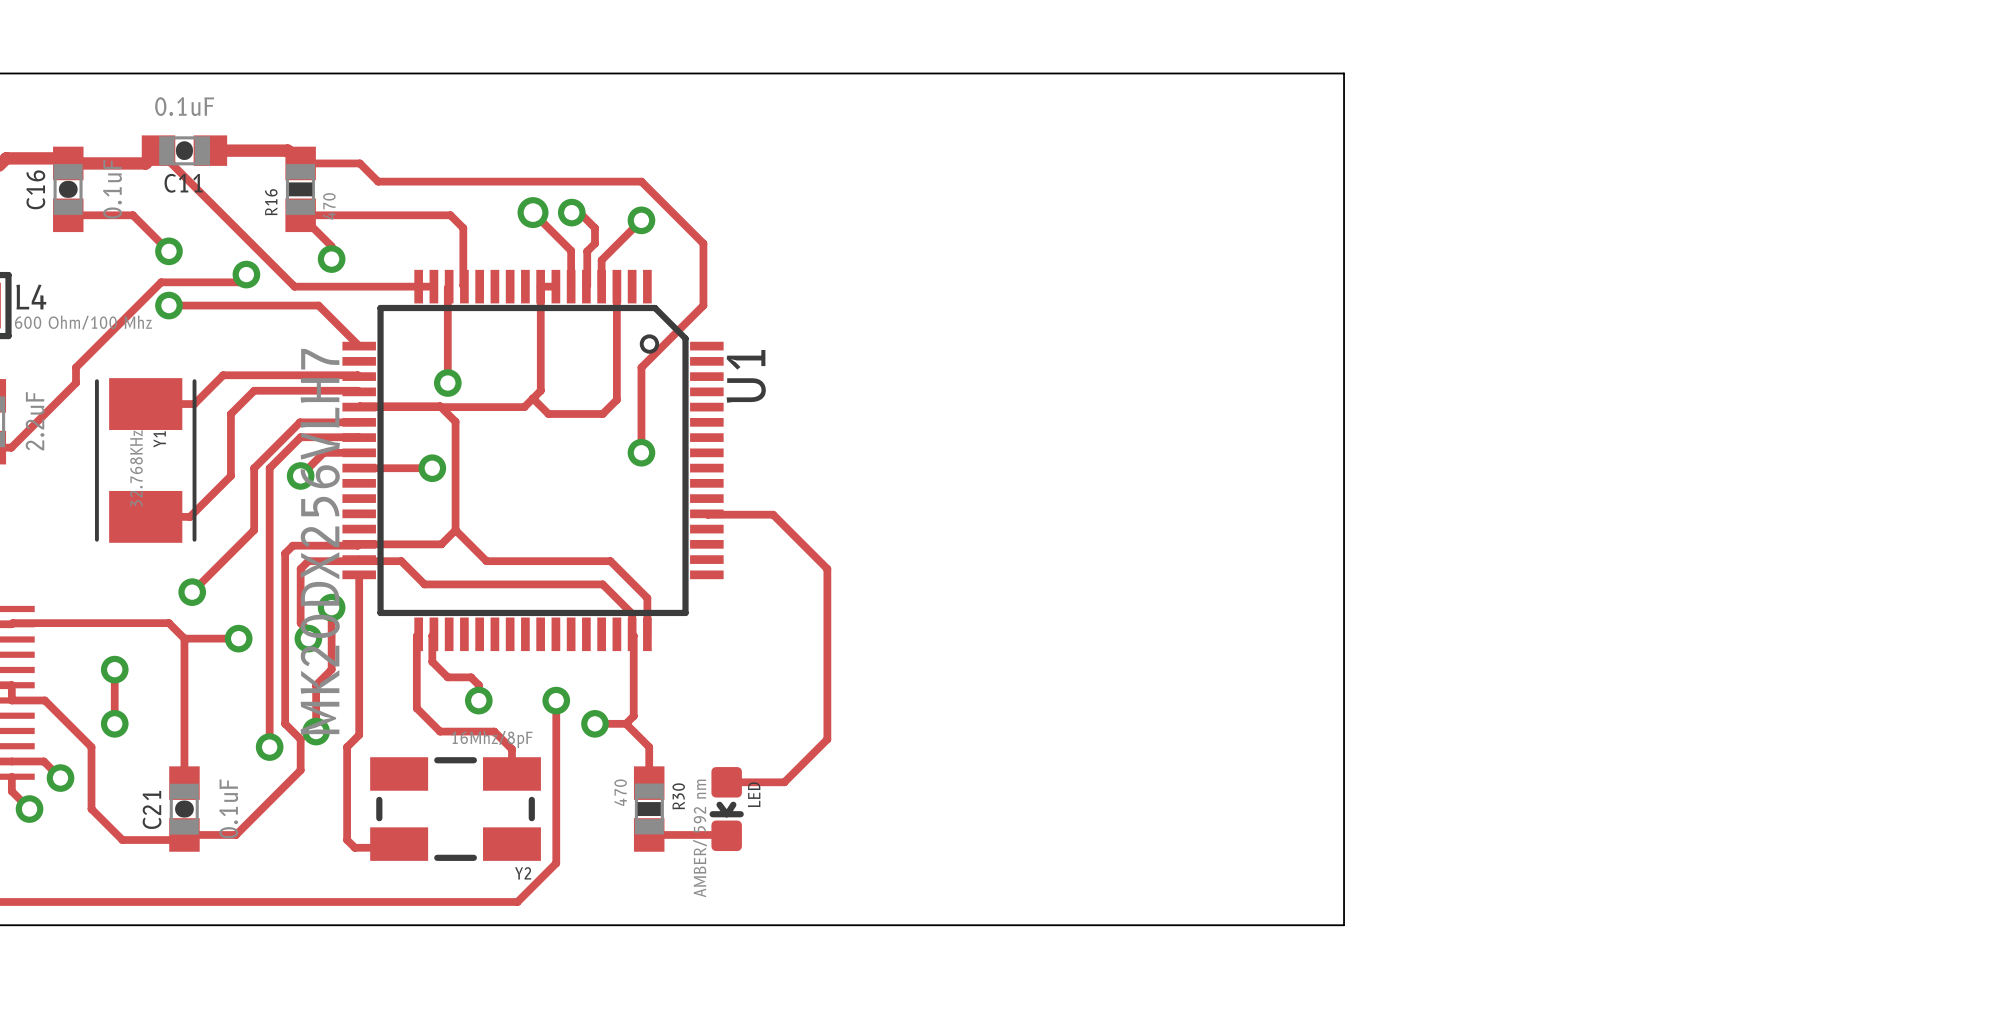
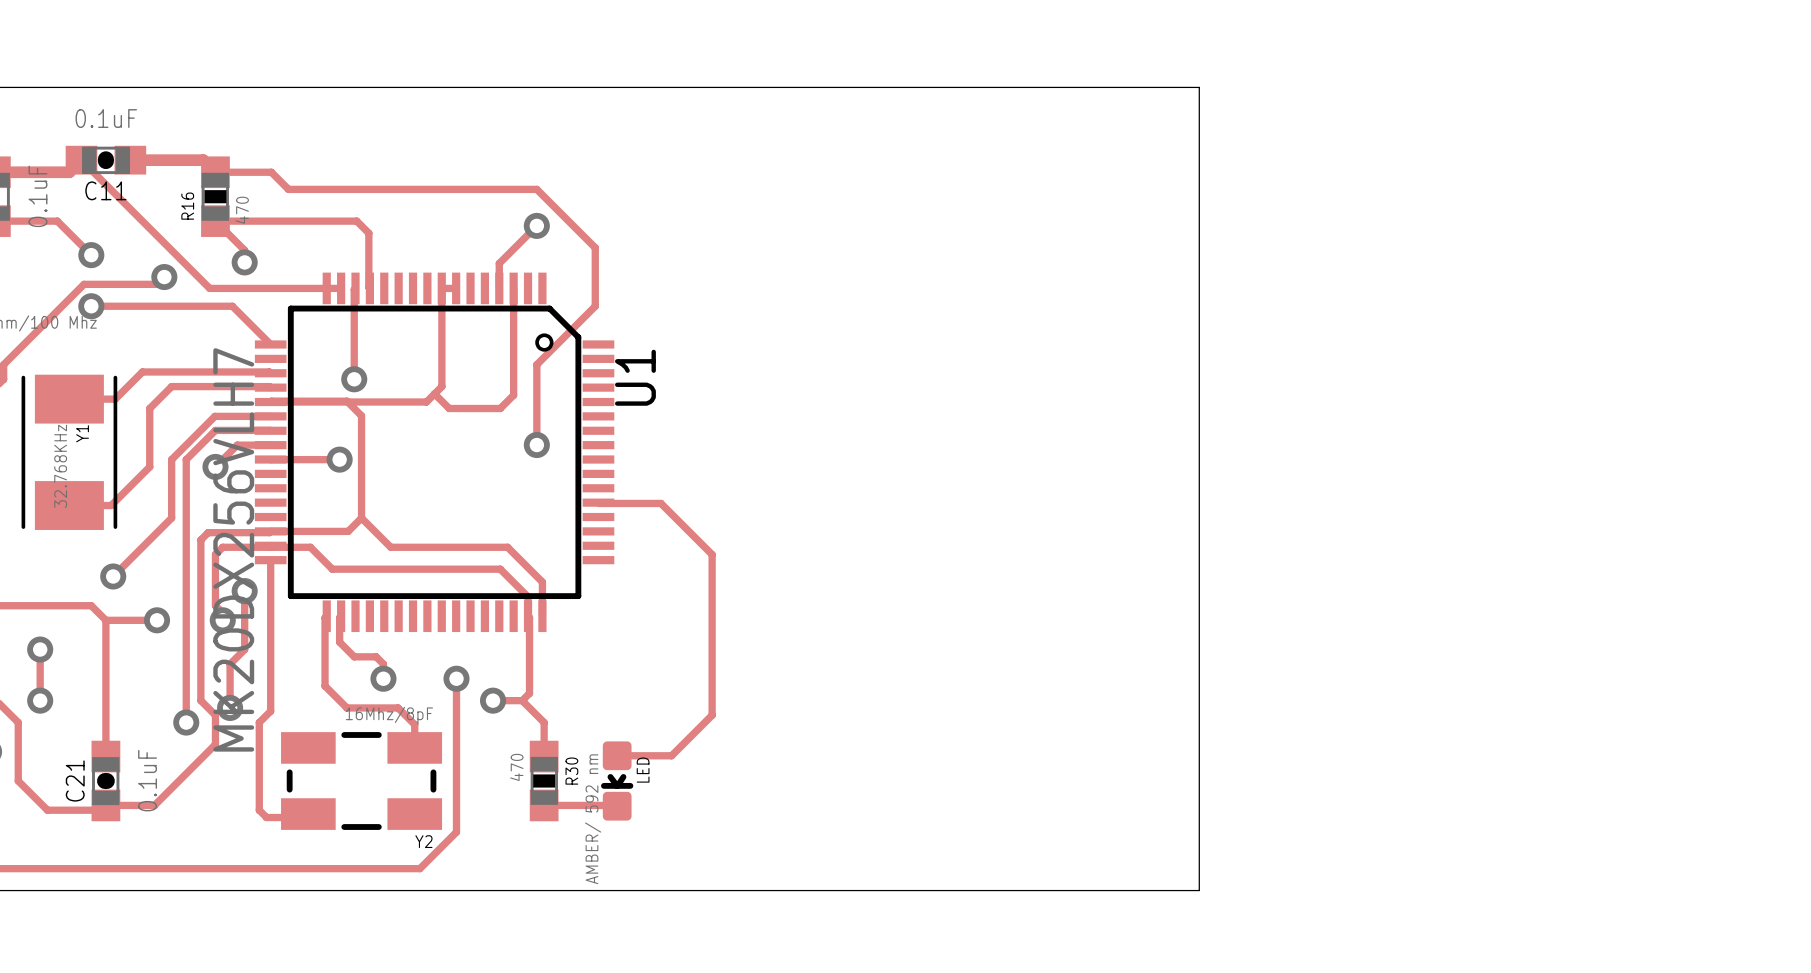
track: (533, 212) (571, 250) (571, 286) -> none
via: (533, 212) -> none
track: (571, 212) (579, 212) (594, 228) (594, 243) (587, 251) (586, 286) -> none
via: (571, 212) -> none

